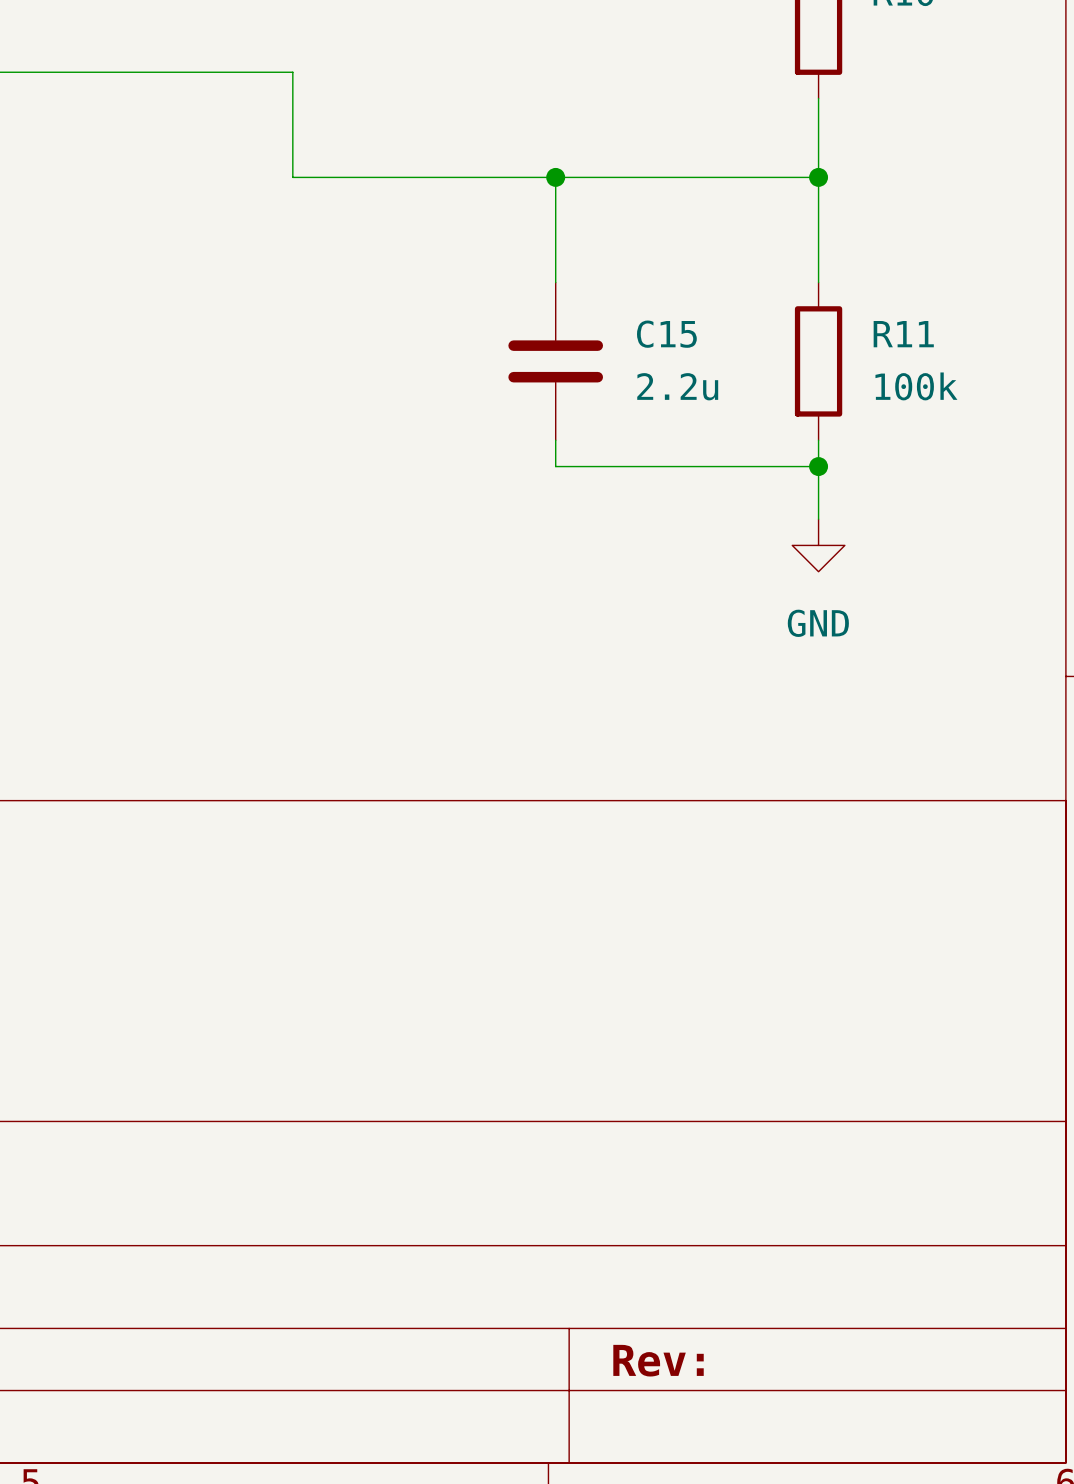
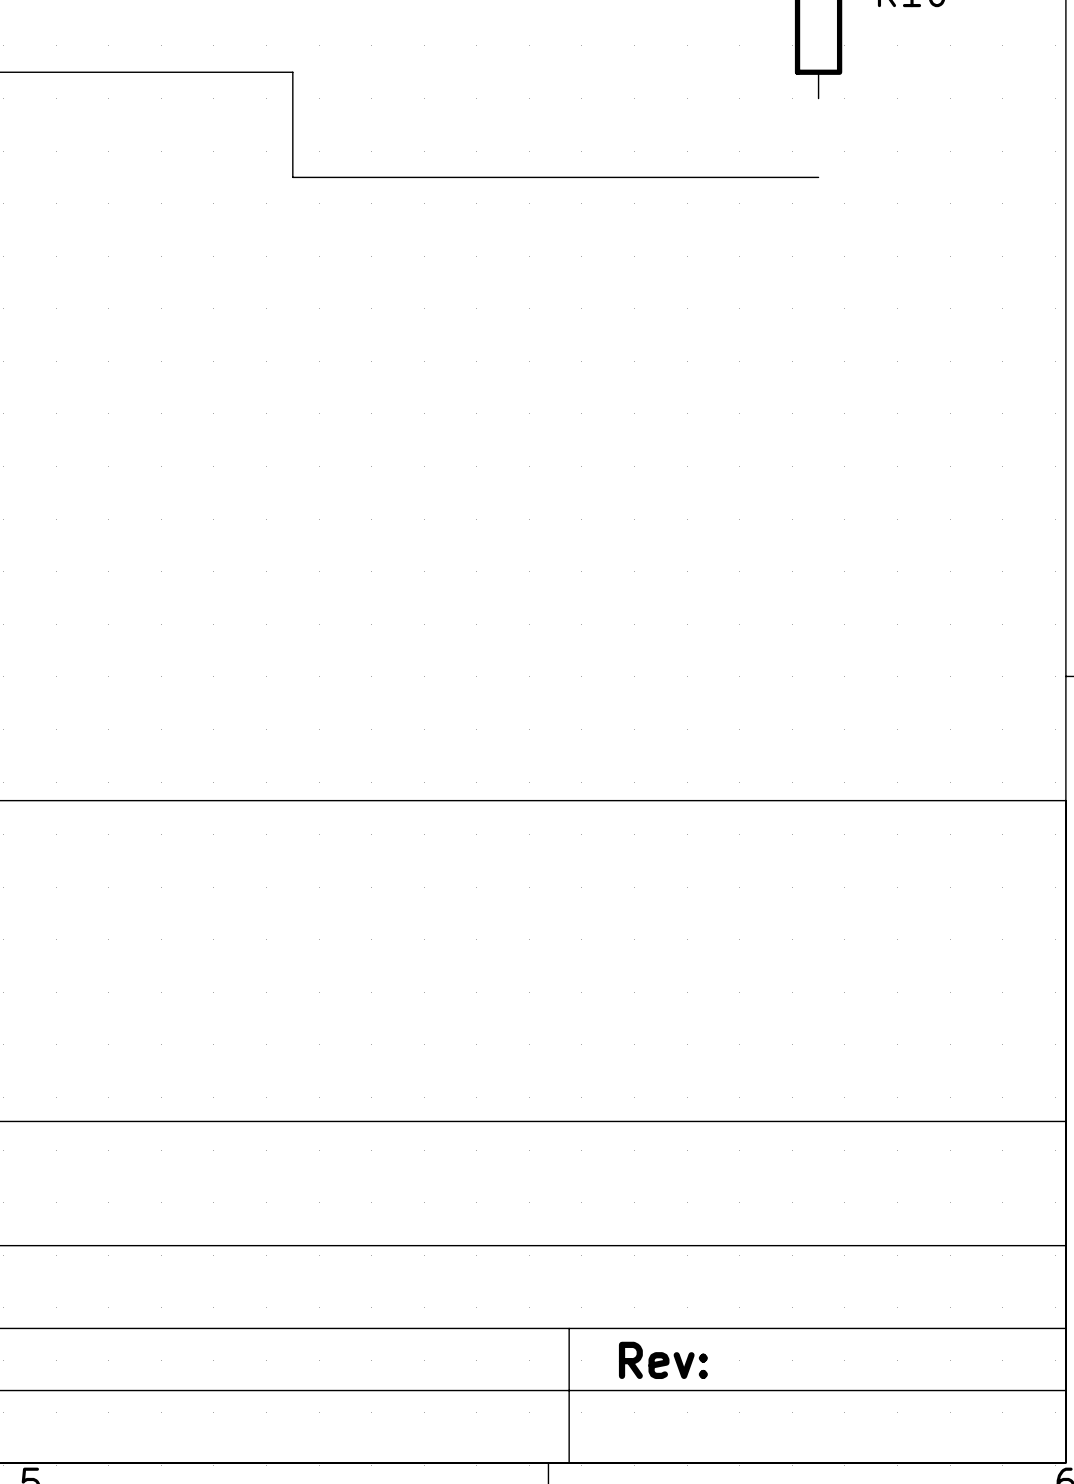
wire: (818, 98) (818, 282) -> none
wire: (555, 177) (555, 282) -> none
junction: (555, 177) -> none
junction: (818, 177) -> none
C15: 2.2u (555, 361) -> none
R11: 100k (818, 361) -> none
wire: (555, 440) (555, 466) (818, 466) -> none
wire: (818, 440) (818, 519) -> none
junction: (818, 466) -> none
power symbol: GND (818, 545) -> none

